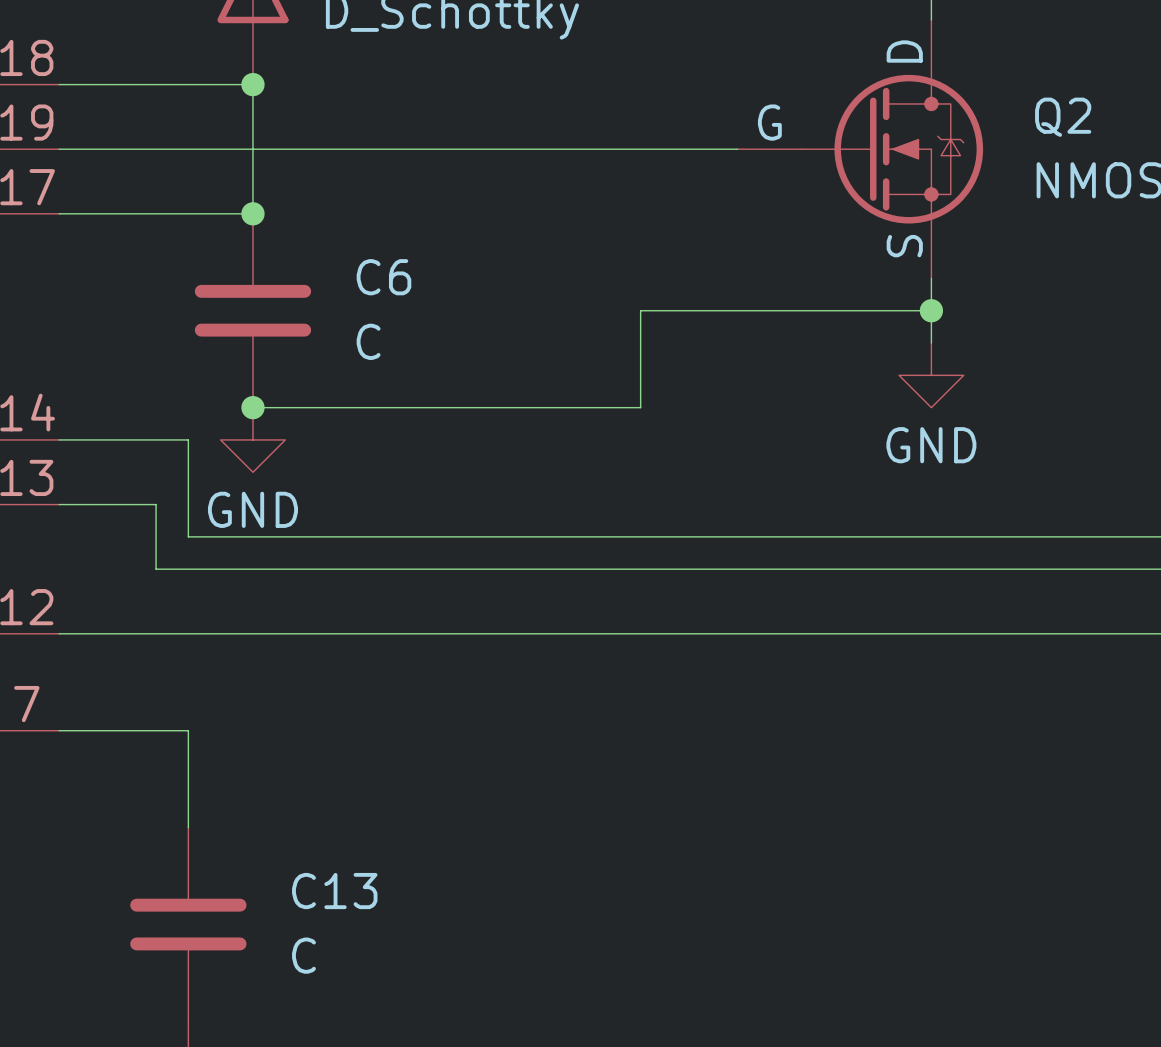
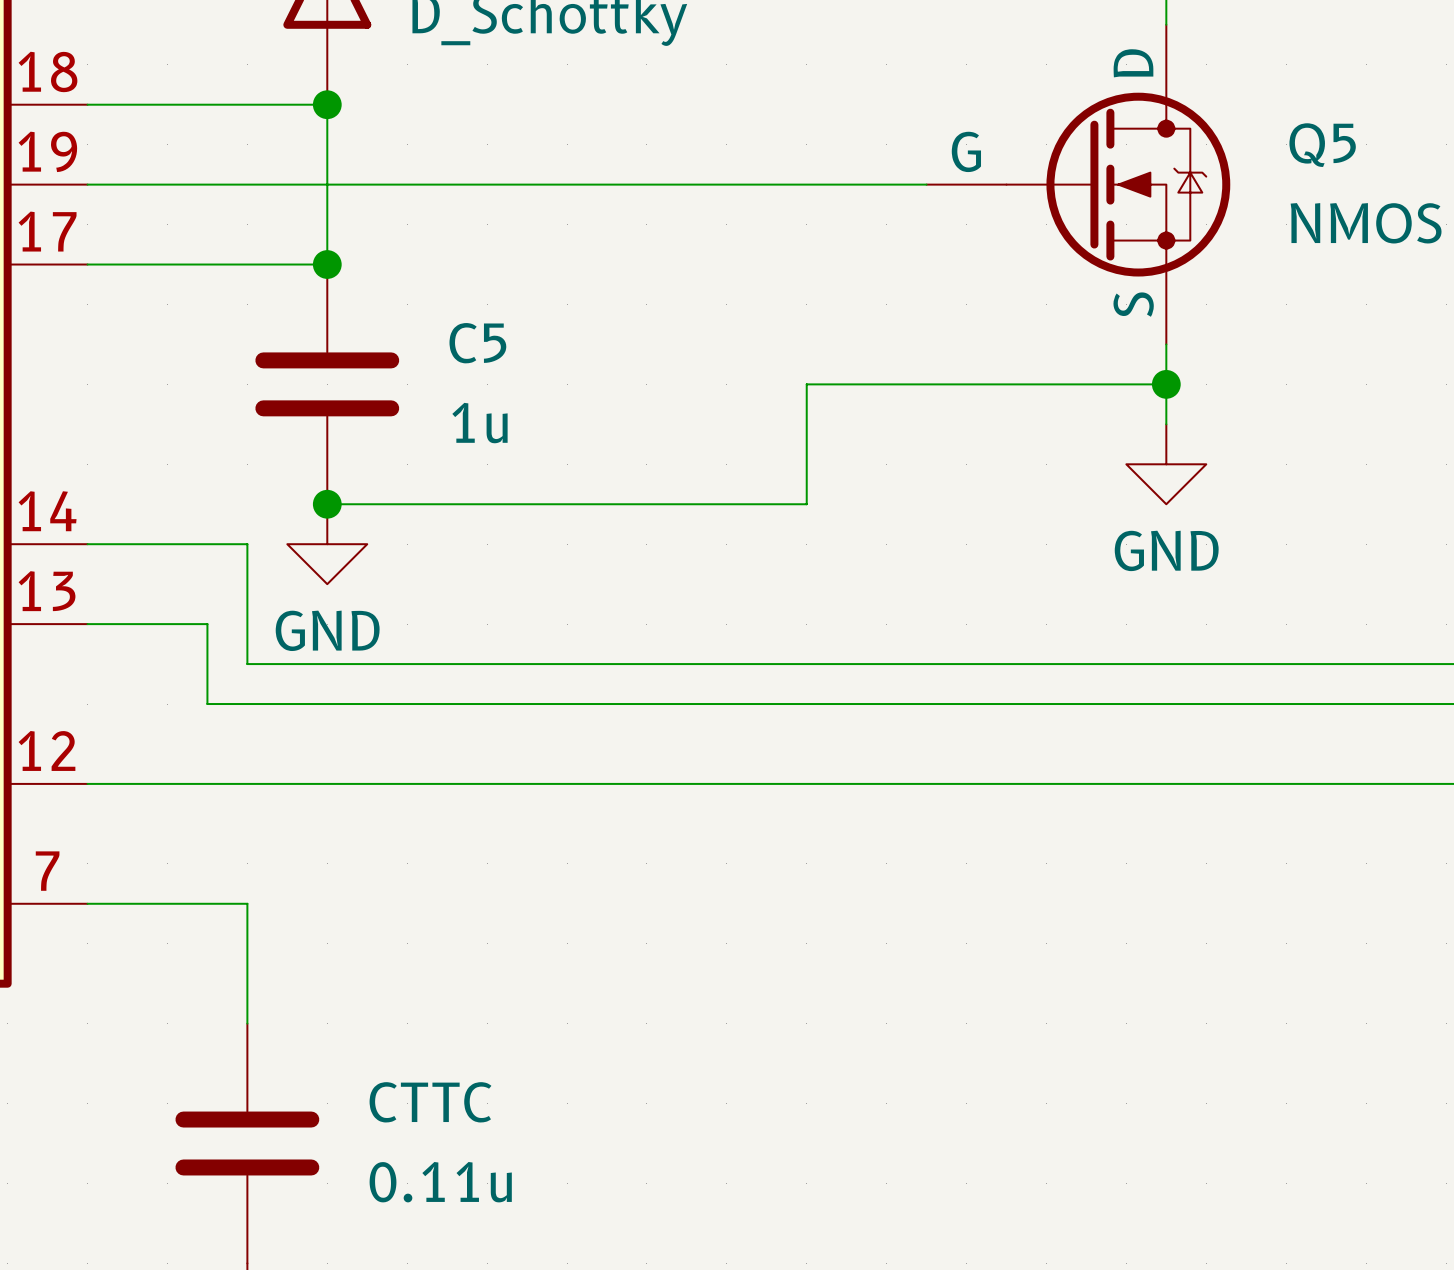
Q2 name: Q2 (1063, 117) -> Q5 (1322, 145)
C6 name: C6 (383, 277) -> C5 (477, 343)
C6 value: C (368, 341) -> 1u (479, 423)
C13 name: C13 (334, 891) -> CTTC (430, 1102)
C13 value: C (303, 955) -> 0.11u (440, 1182)

